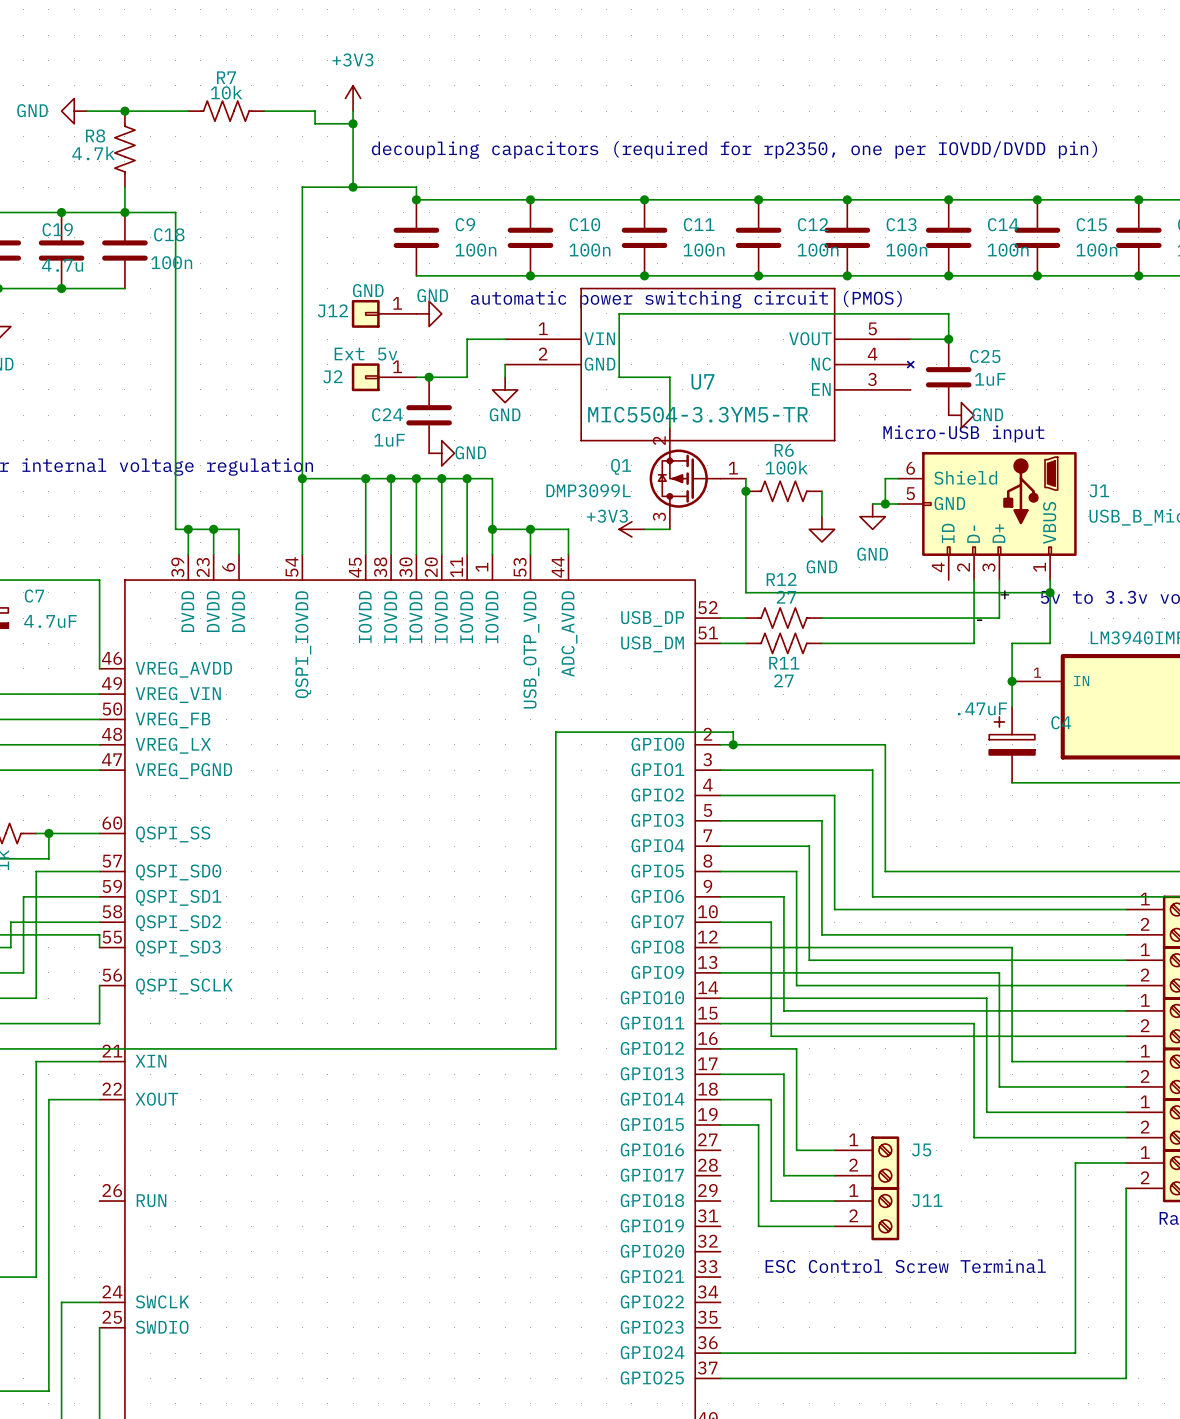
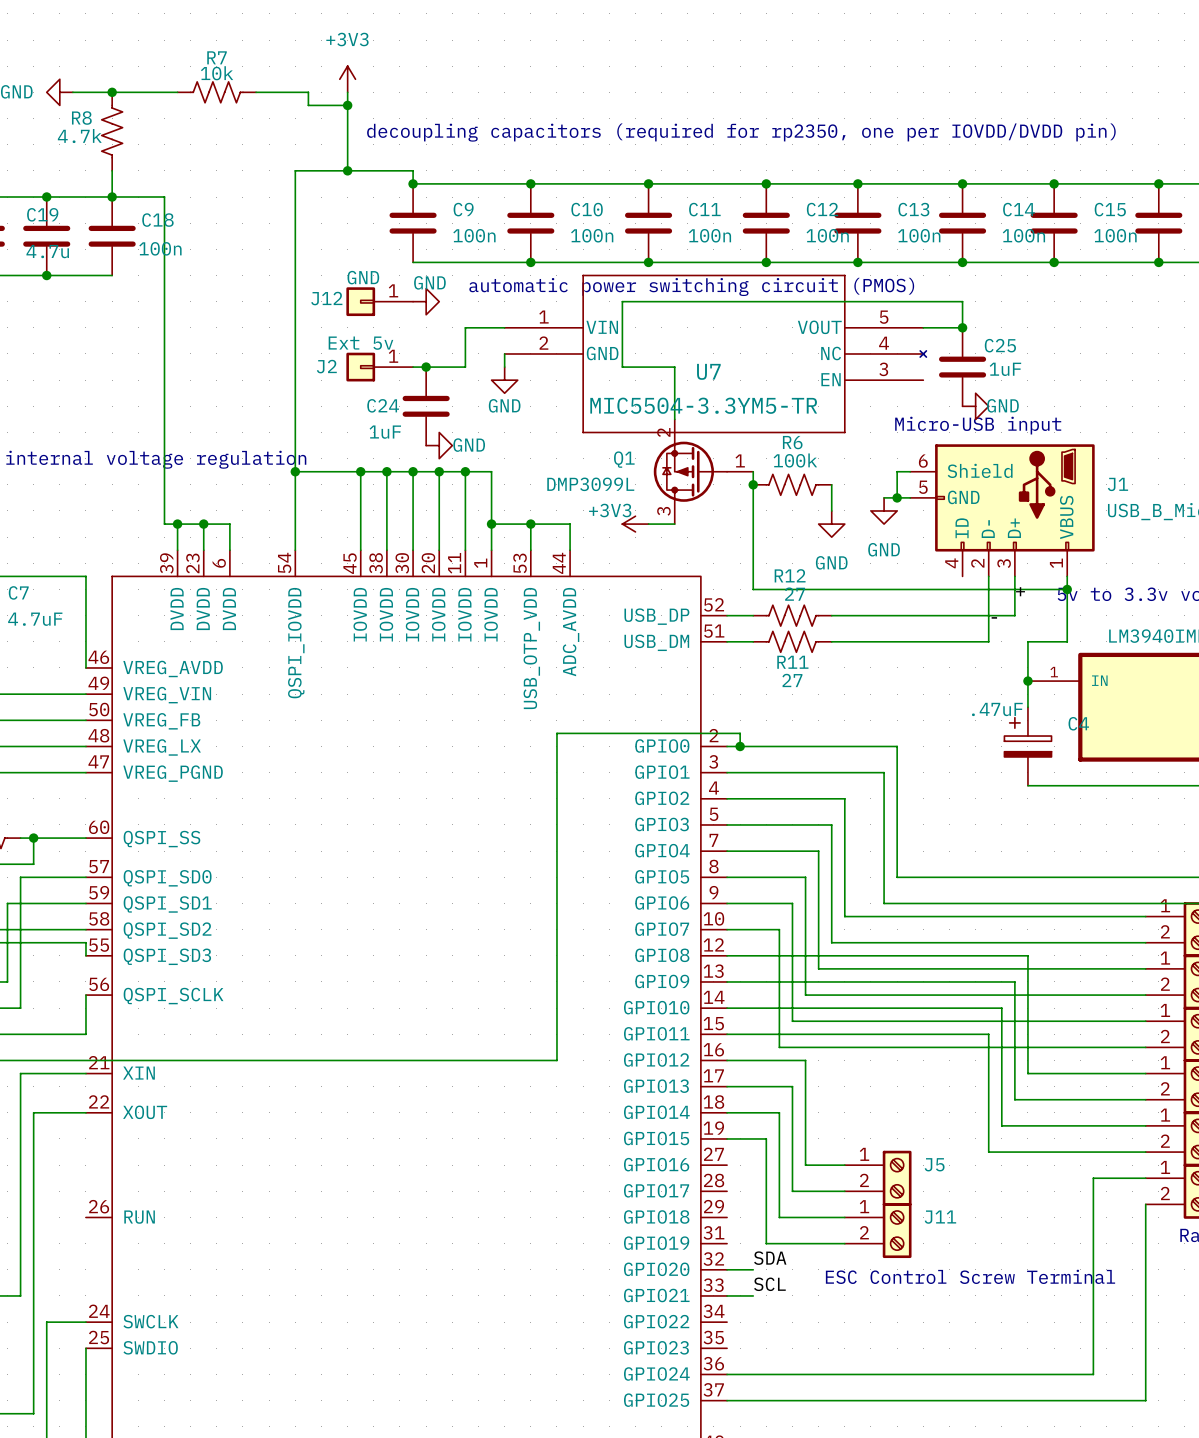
label: none -> SDA (770, 1258)
wire: none -> (727, 1269) (753, 1269)
label: none -> SCL (769, 1284)
text position: ESC Control Screw Terminal (905, 1266) -> ESC Control Screw Terminal (970, 1276)
wire: none -> (727, 1295) (753, 1295)

